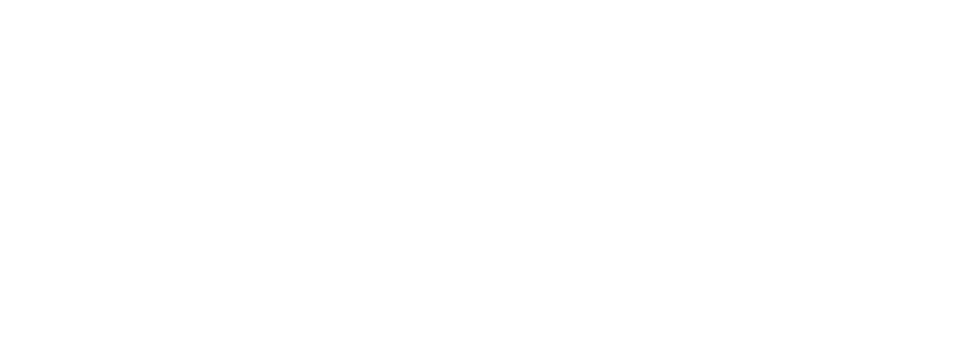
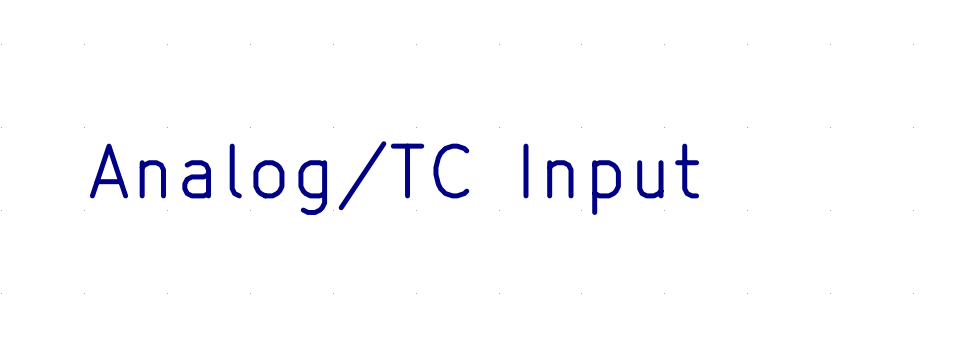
text: none -> Analog/TC Input (394, 178)

